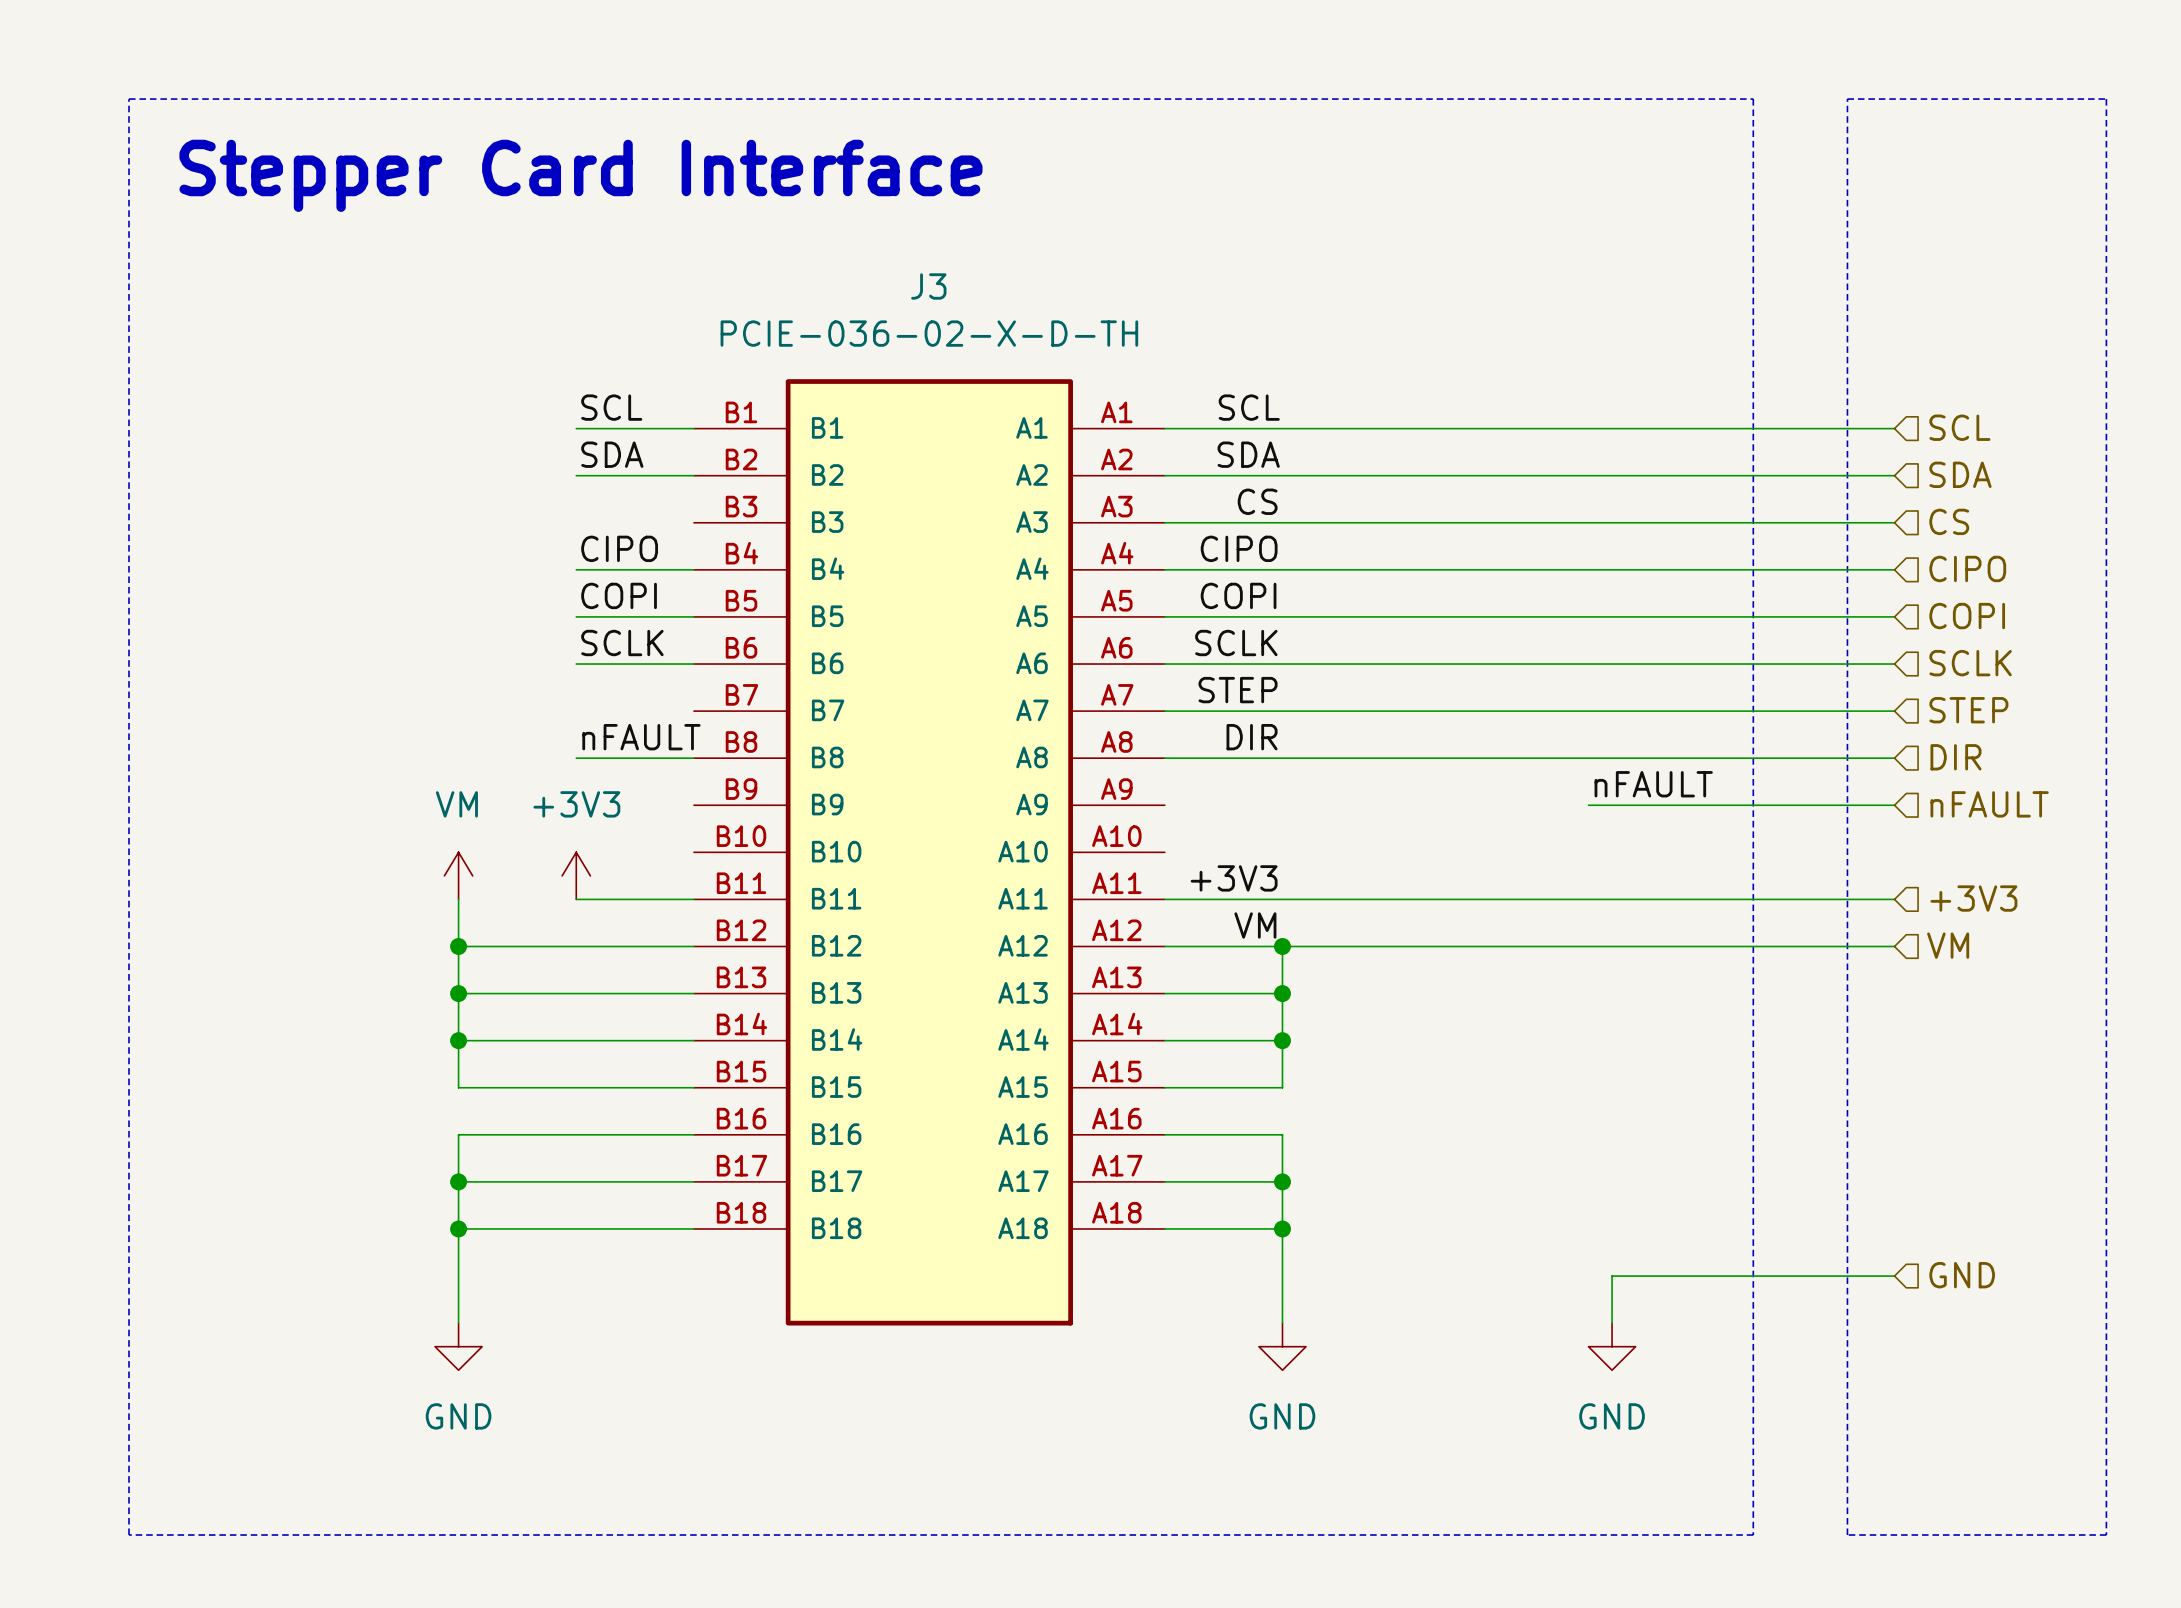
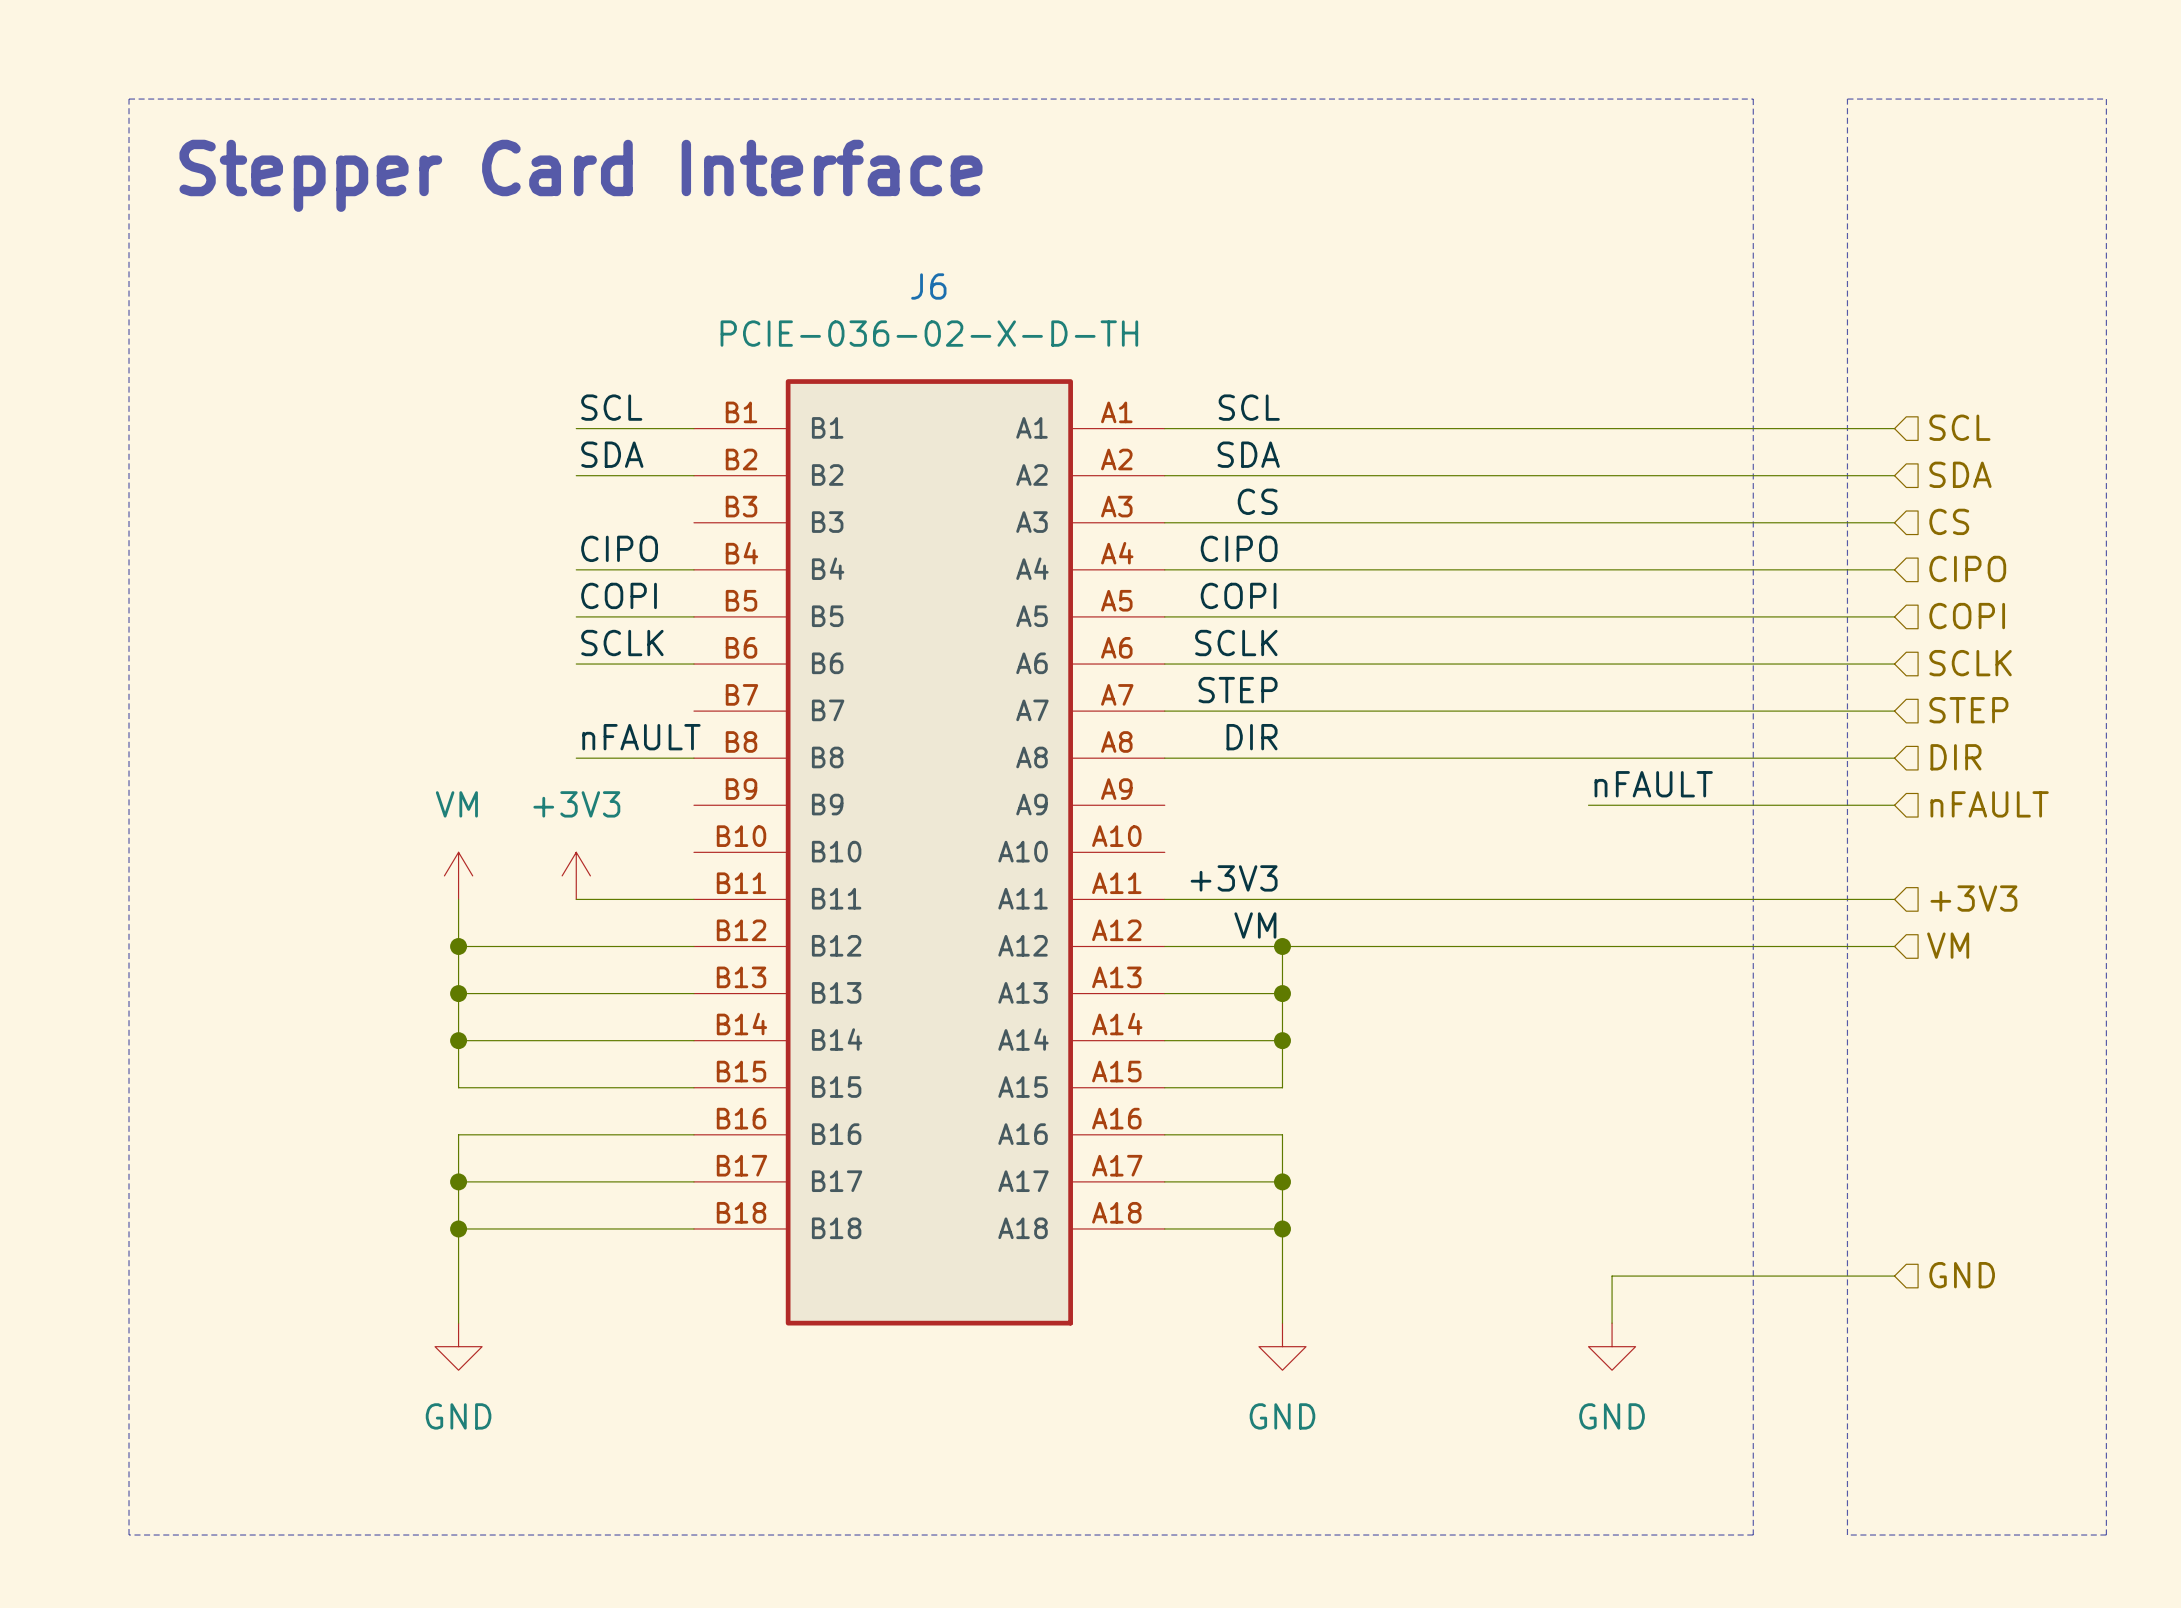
J3 name: J3 (928, 286) -> J6 (928, 286)

